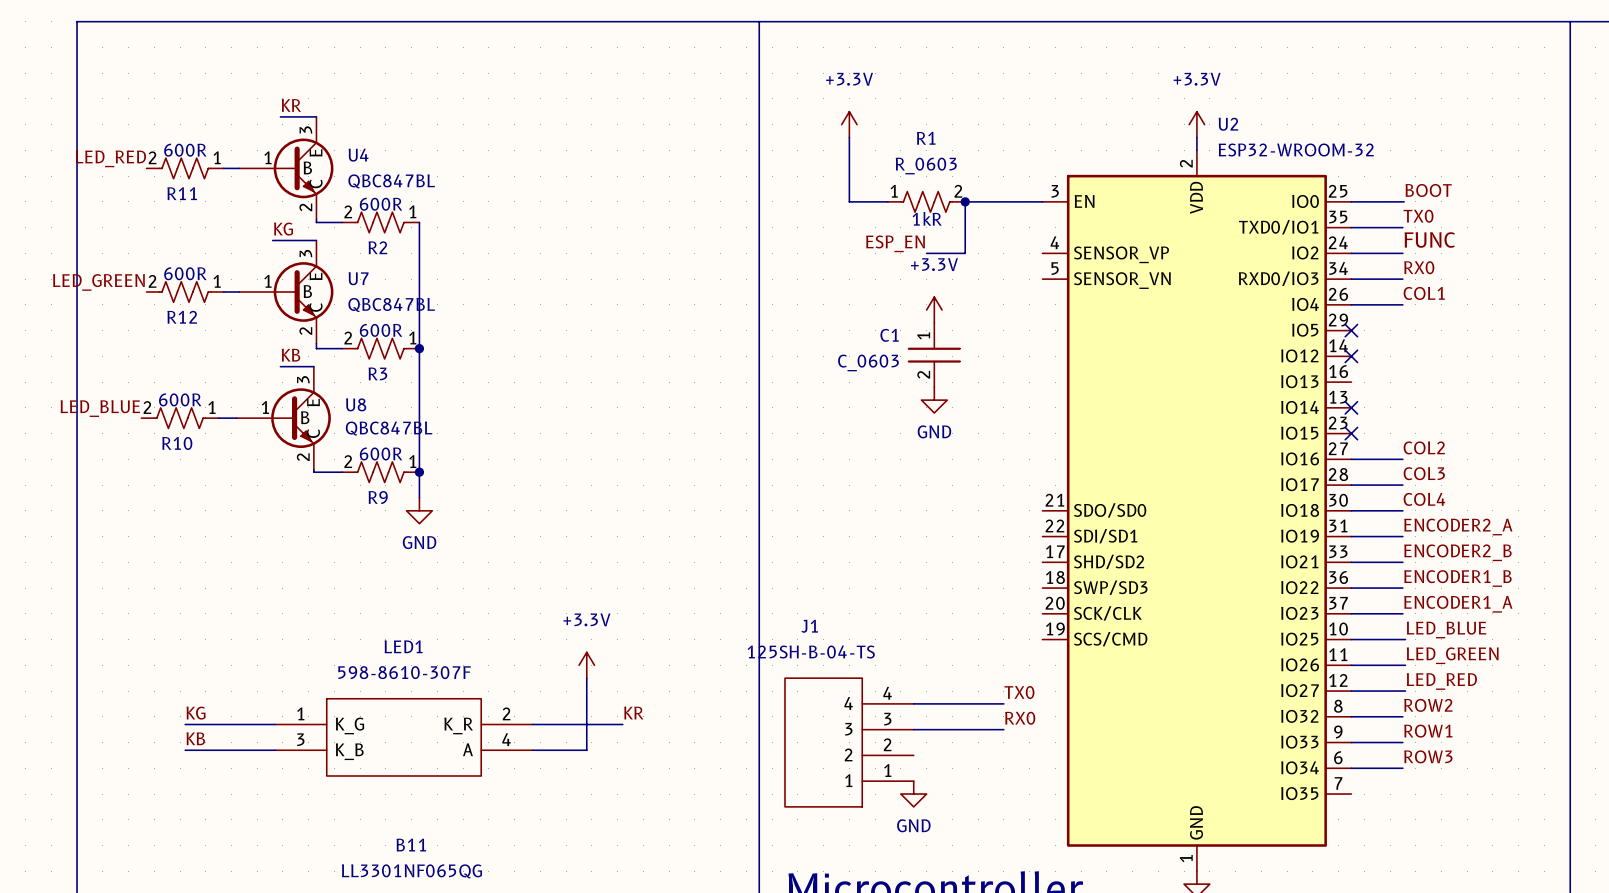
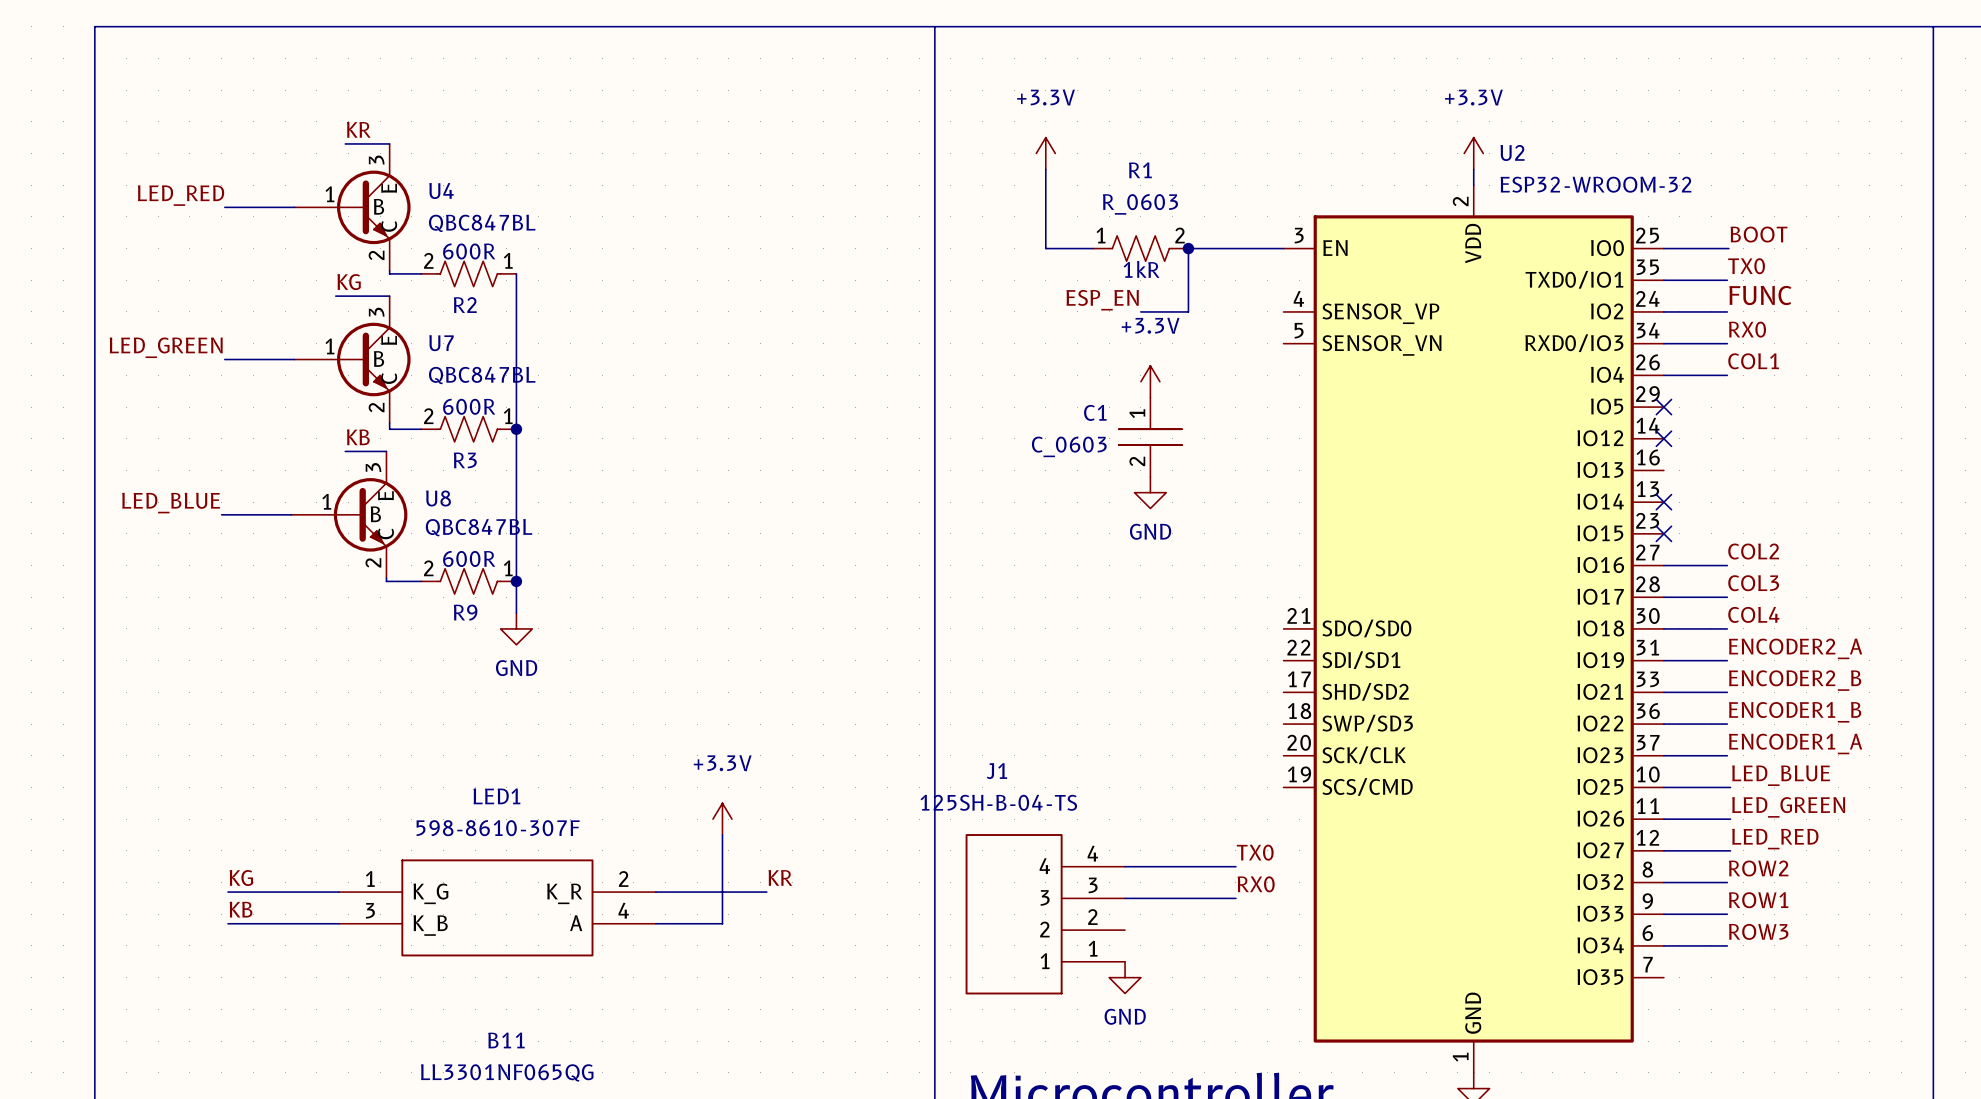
label position: LED_RED (110, 158) -> LED_RED (181, 195)
R11: (185, 168) -> none
label position: LED_GREEN (98, 282) -> LED_GREEN (166, 347)
R12: (185, 291) -> none
label position: LED_BLUE (100, 408) -> LED_BLUE (171, 503)
R10: (180, 418) -> none

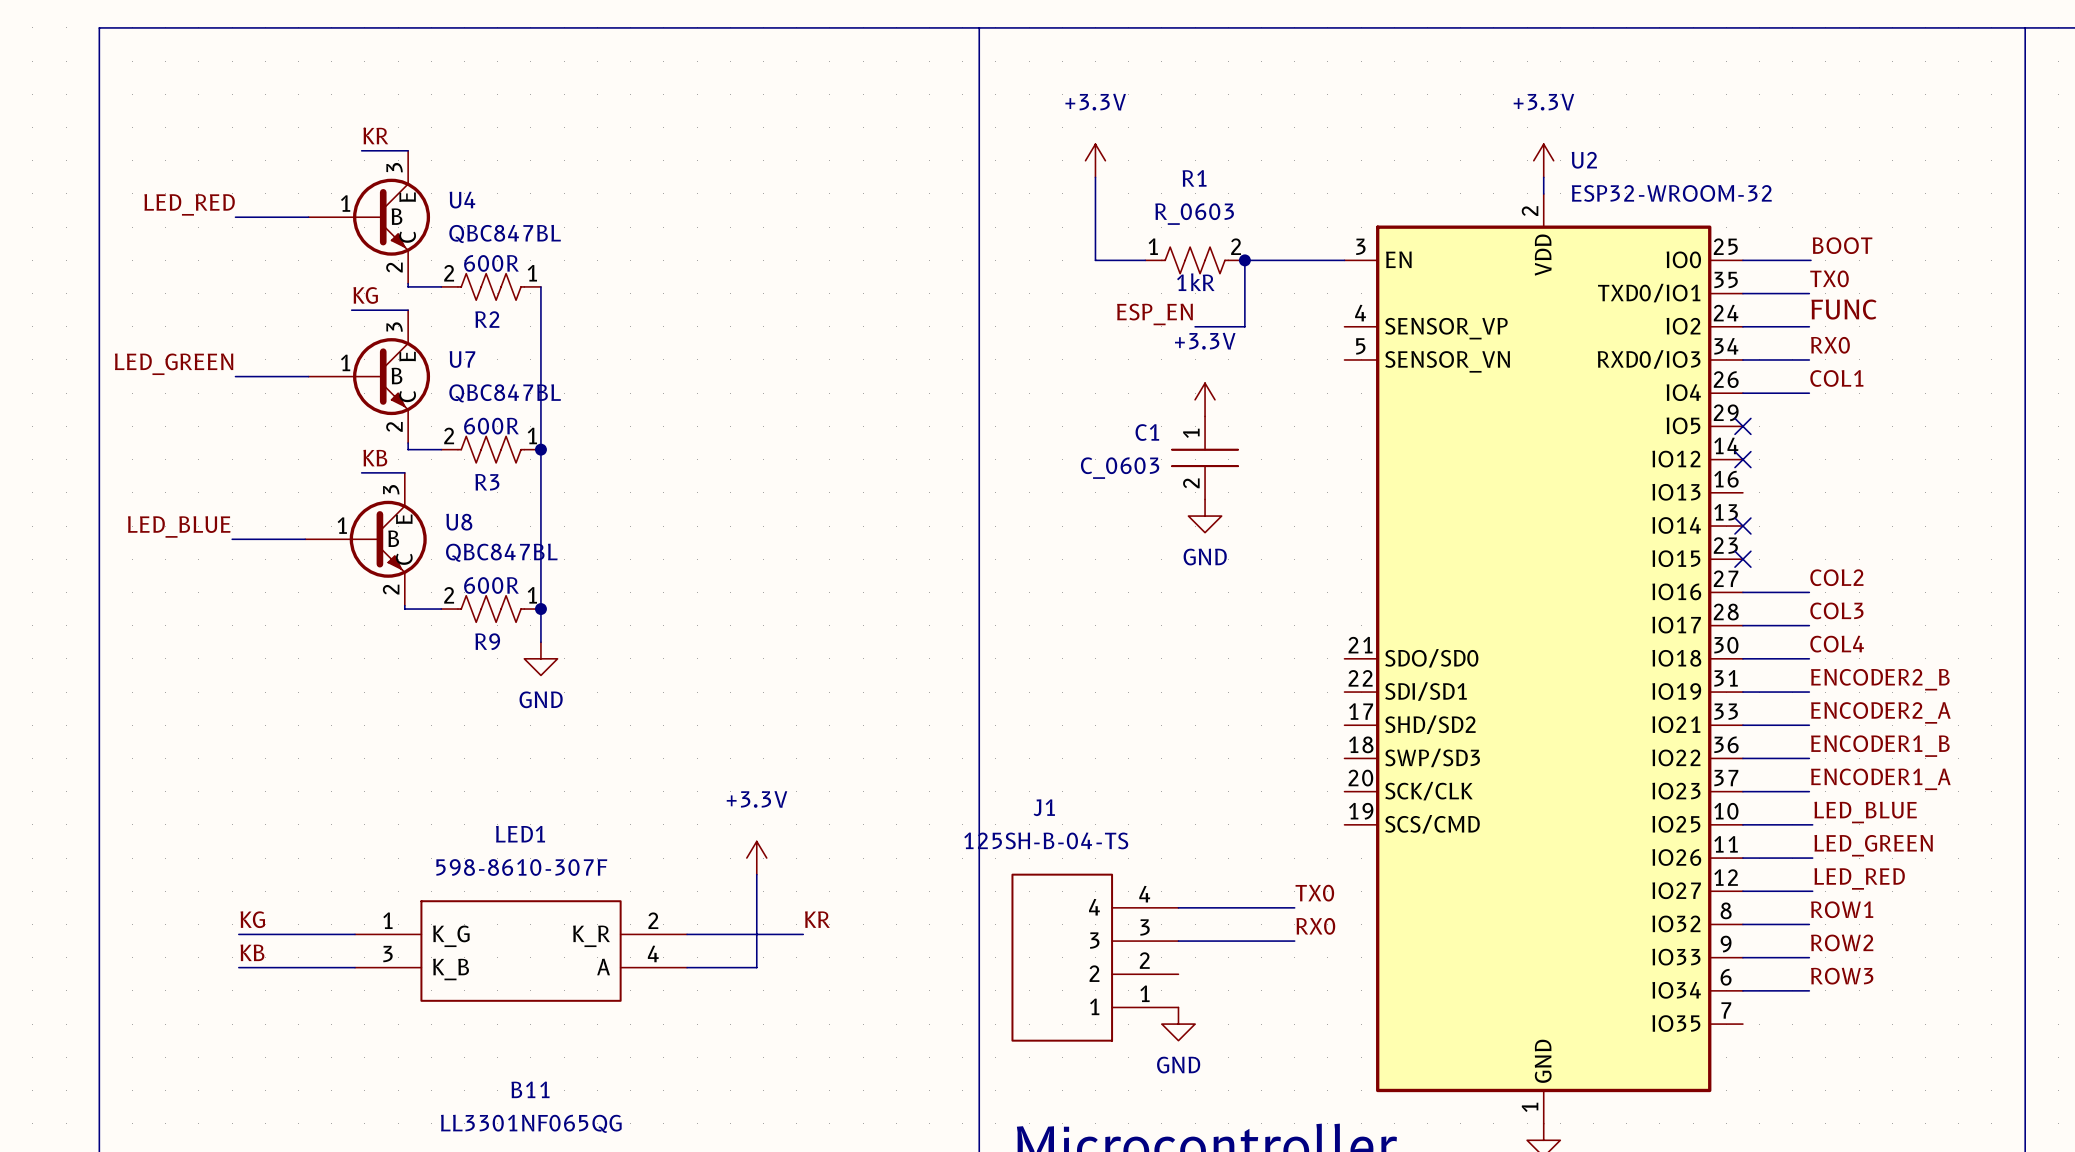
label: ENCODER2_A (1795, 648) -> ENCODER2_B (1880, 679)
label: ENCODER2_B (1795, 680) -> ENCODER2_A (1880, 712)
label: ROW2 (1758, 868) -> ROW1 (1842, 909)
label: ROW1 (1758, 900) -> ROW2 (1842, 942)

